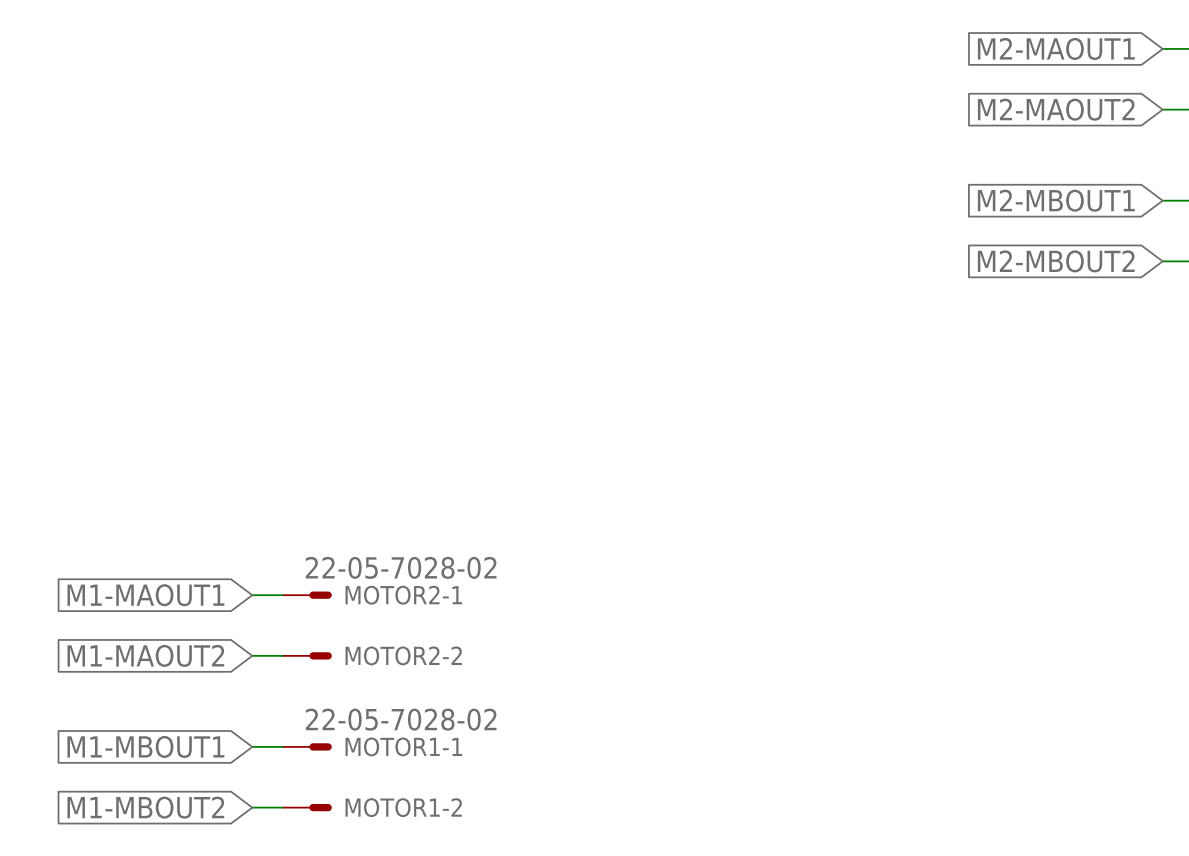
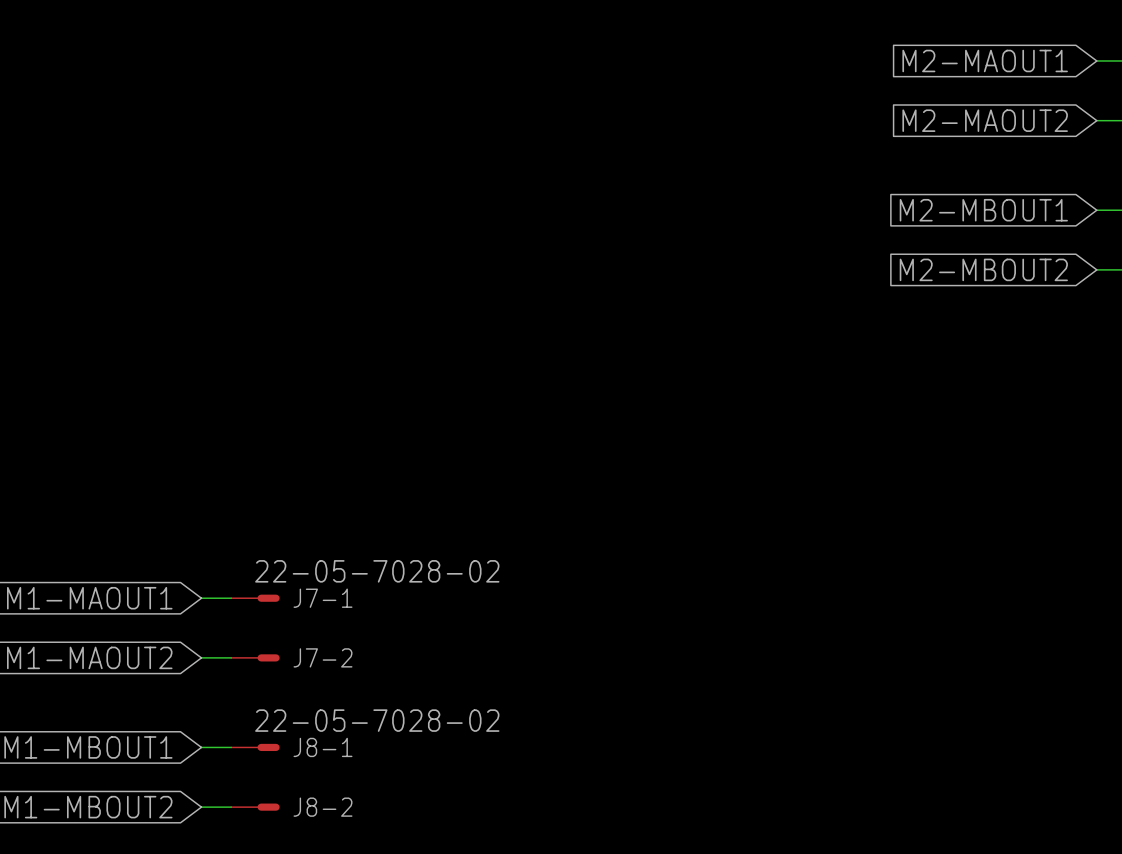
MOTOR2-1 name: MOTOR2-1 (403, 595) -> J7-1 (323, 598)
MOTOR2-2 name: MOTOR2-2 (403, 655) -> J7-2 (323, 657)
MOTOR1-1 name: MOTOR1-1 (403, 746) -> J8-1 (323, 747)
MOTOR1-2 name: MOTOR1-2 (403, 807) -> J8-2 (323, 807)

